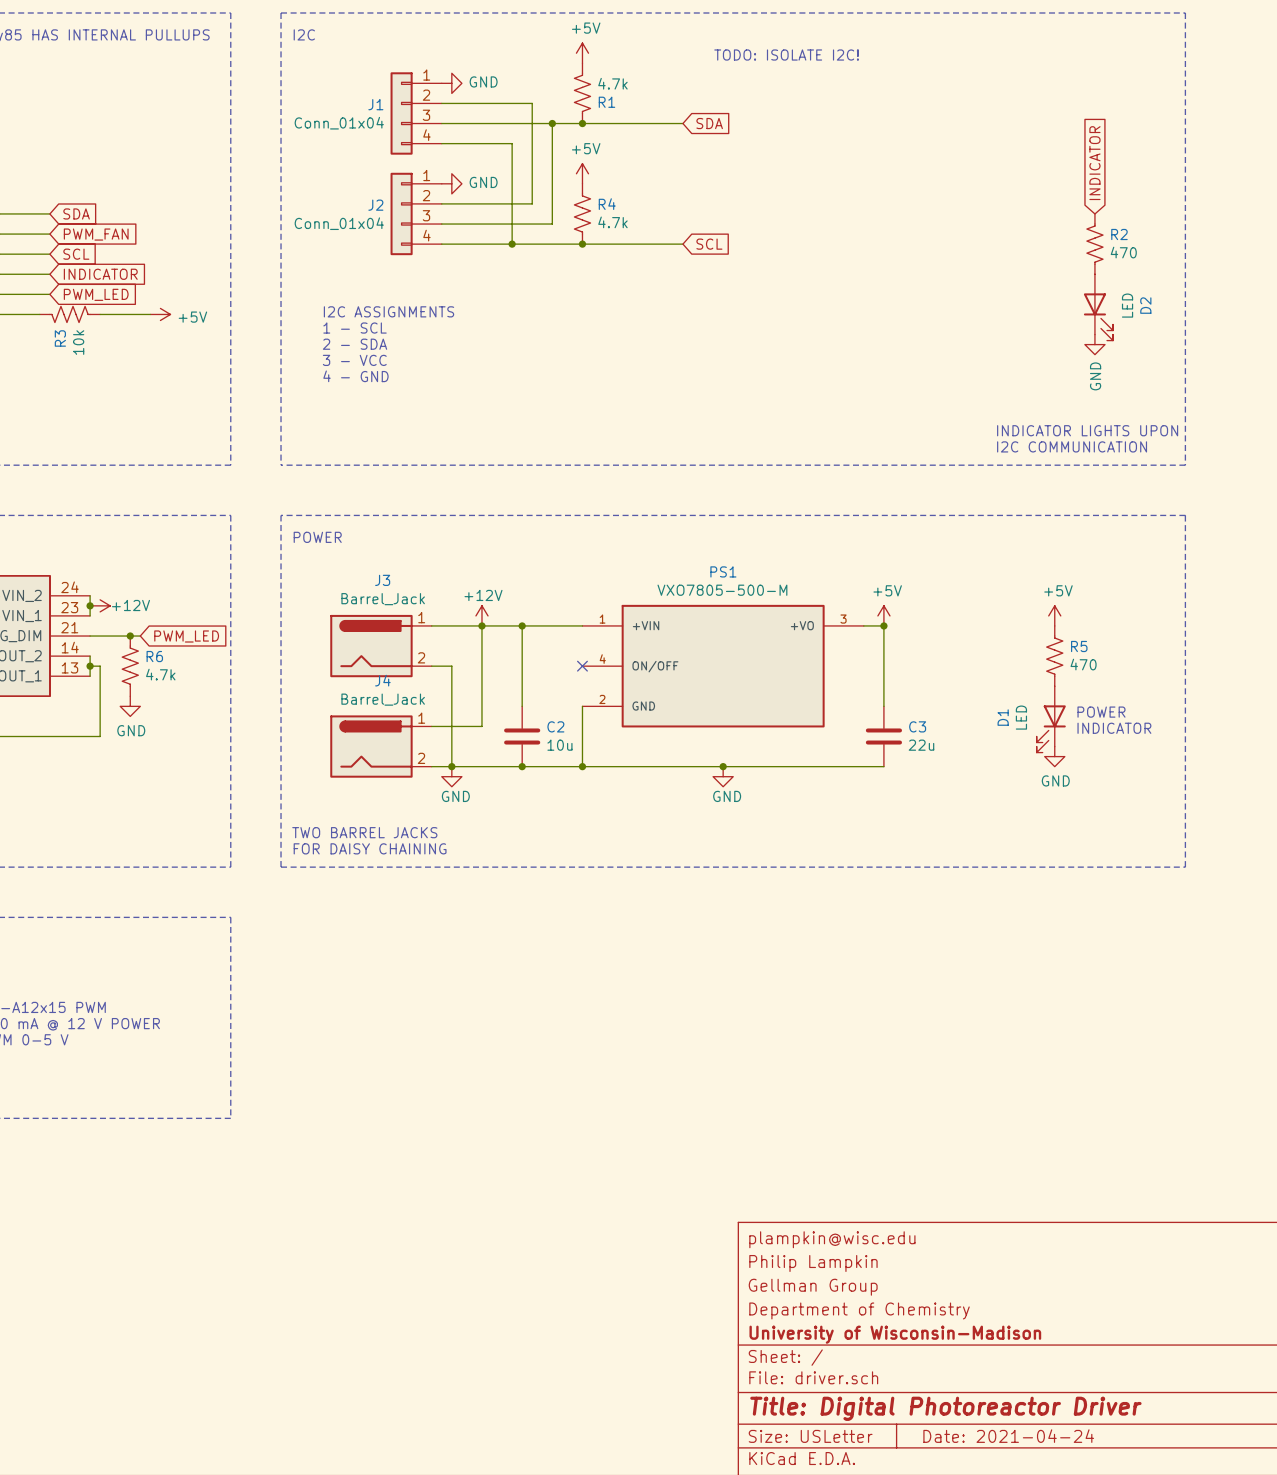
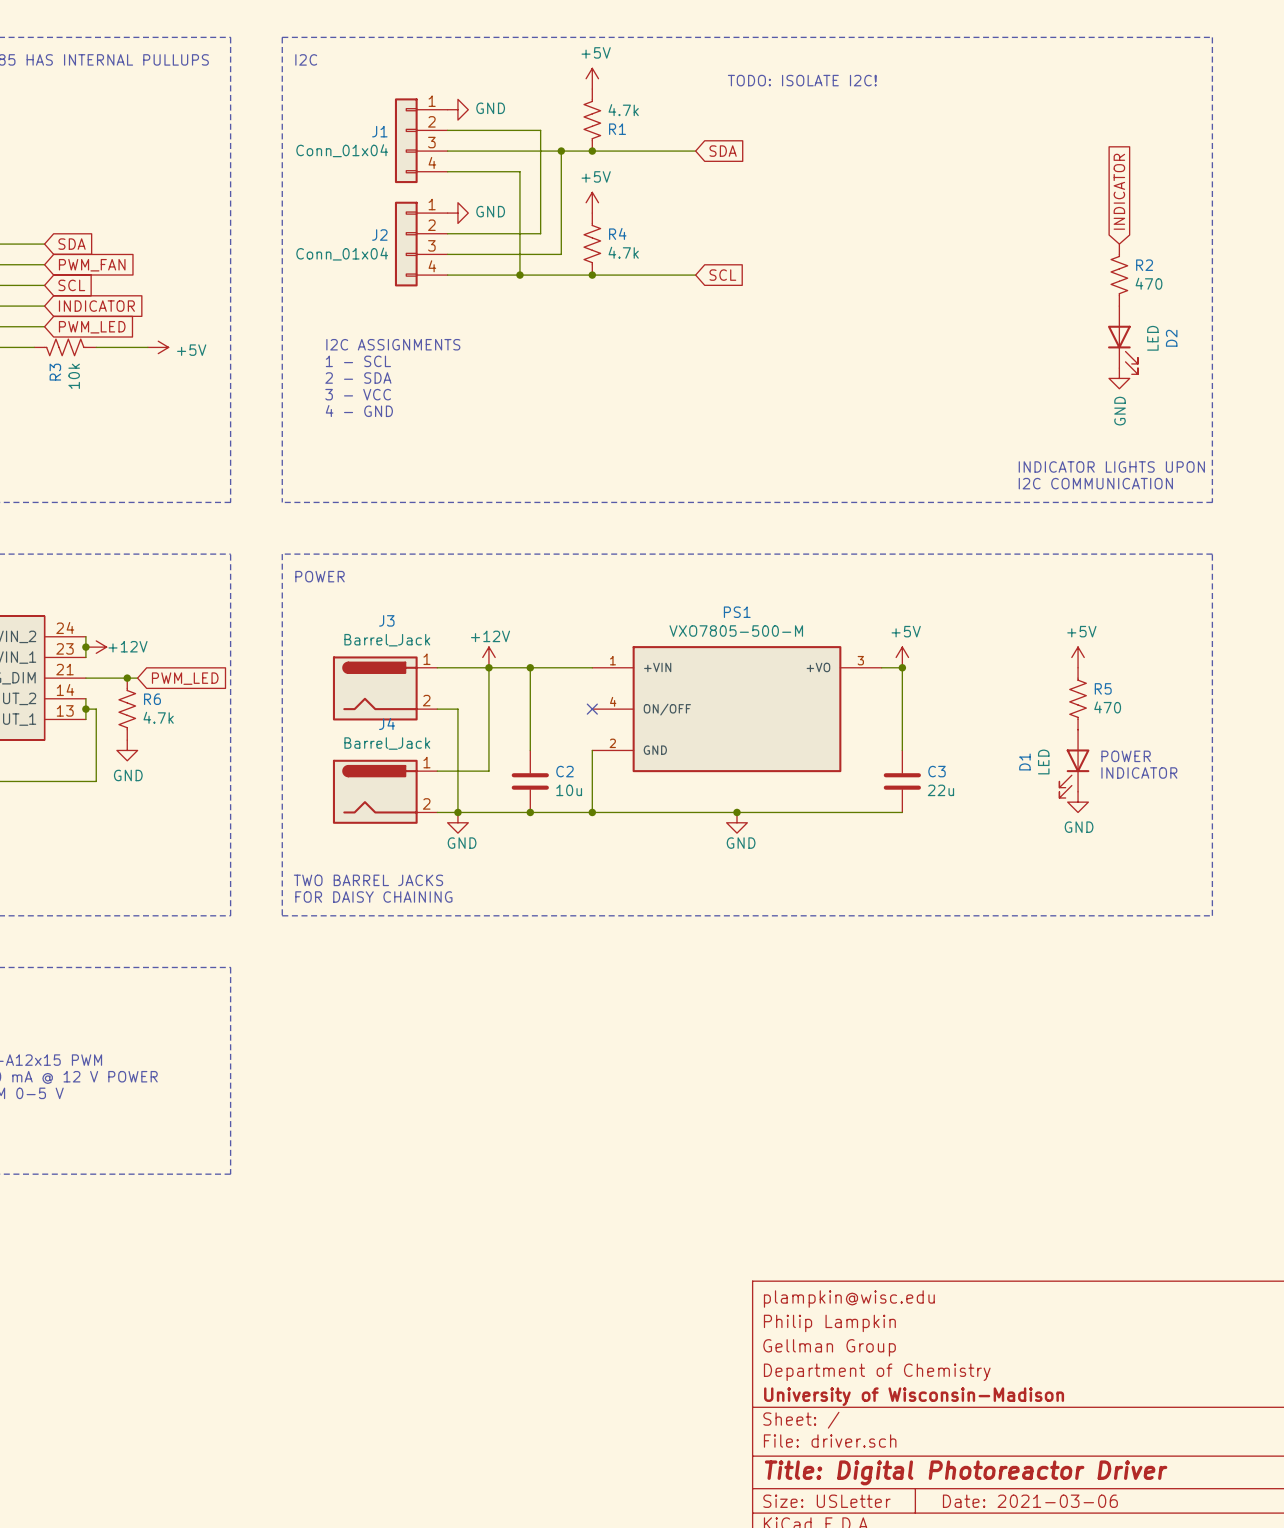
title block: Date: 2021-04-24 (1008, 1436) -> Date: 2021-03-06 (1030, 1501)

